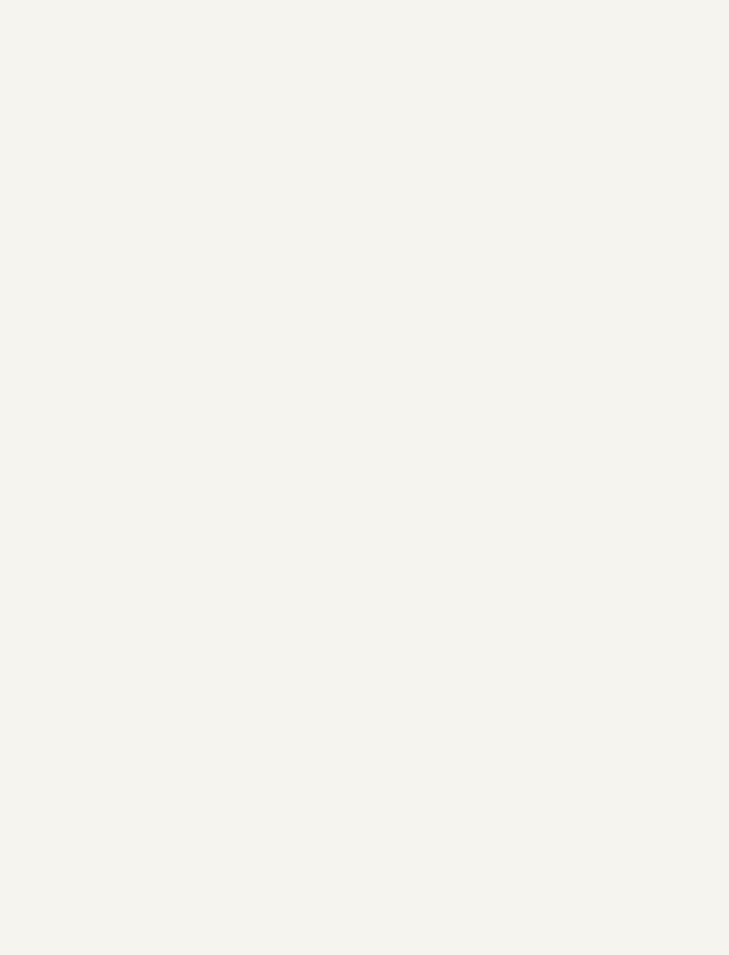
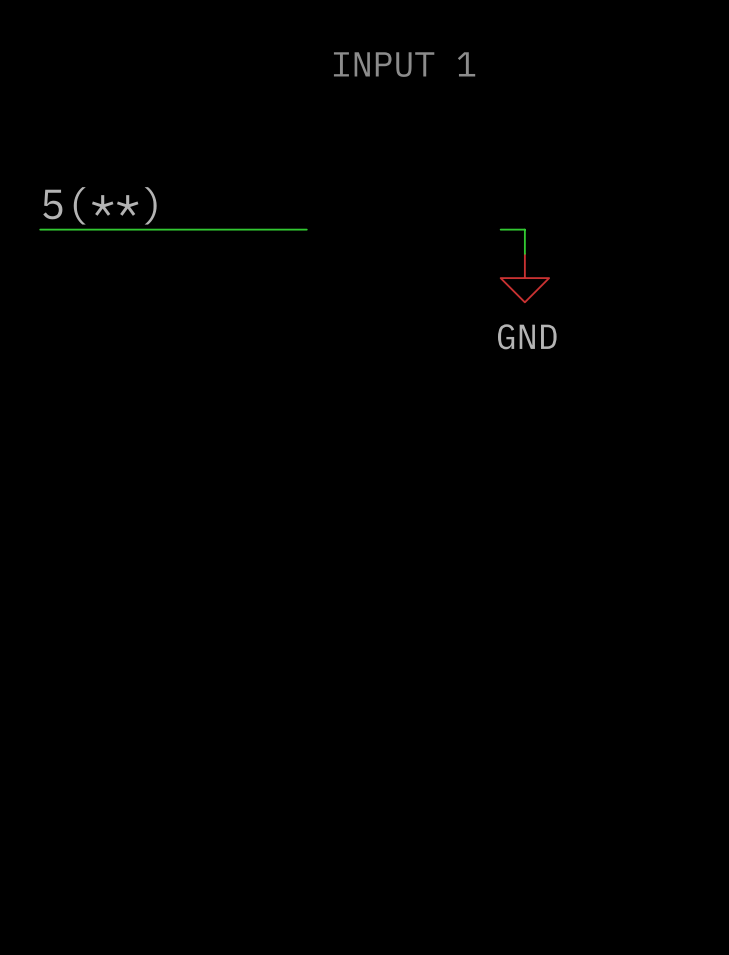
text: none -> INPUT 1 (404, 64)
label: none -> 5(**) (99, 205)
wire: none -> (40, 229) (306, 229)
wire: none -> (500, 229) (524, 229) (524, 253)
power symbol: none -> GND (524, 278)

